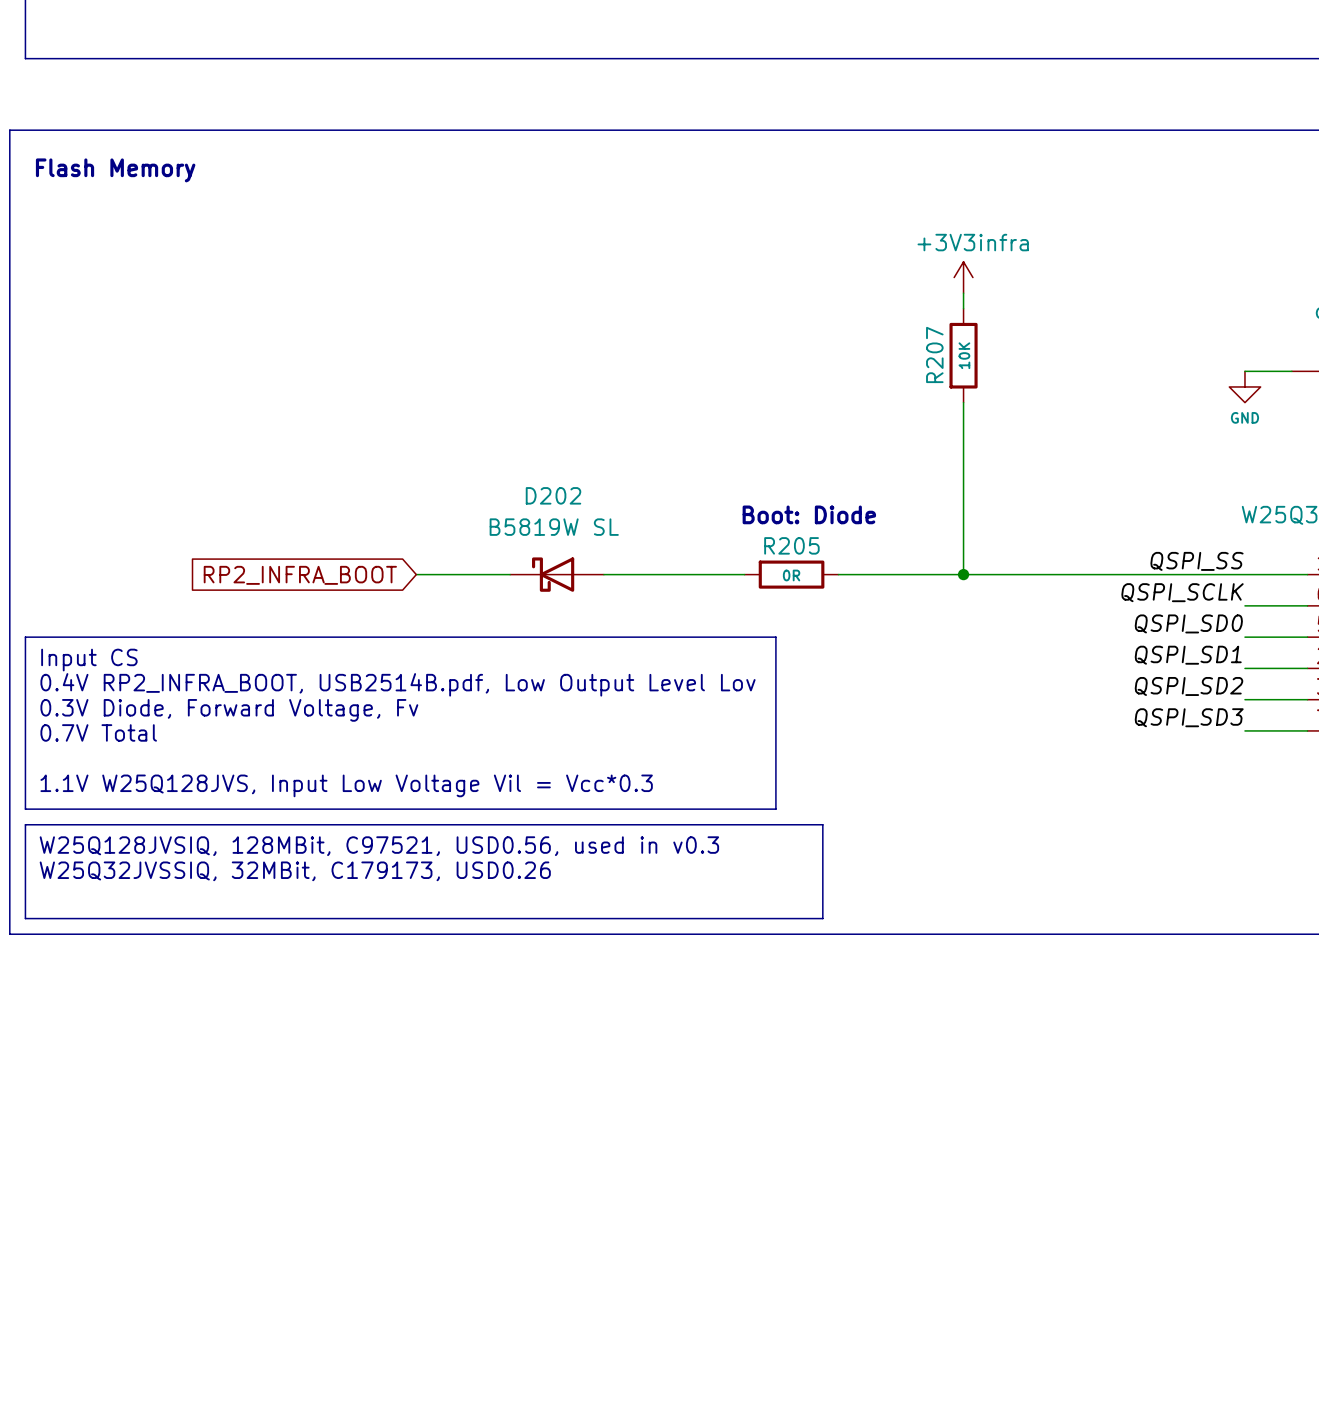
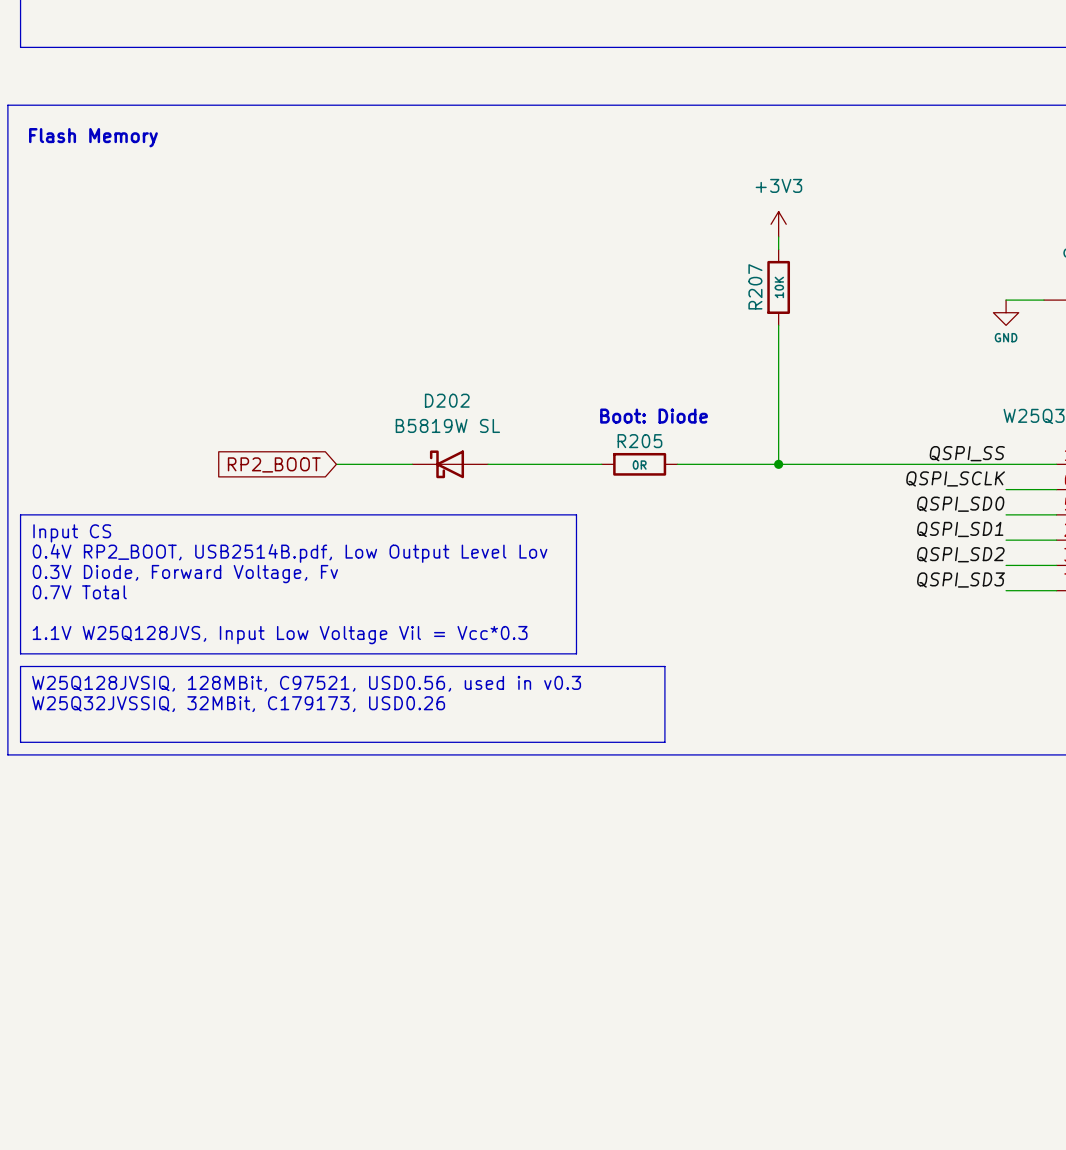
power symbol: +3V3infra (963, 277) -> +3V3 (778, 224)
global label: RP2_INFRA_BOOT (300, 575) -> RP2_BOOT (274, 464)
line: (713, 637) (775, 637) (775, 809) (713, 809) -> (576, 514) (576, 653)
text: 0.4V RP2_INFRA_BOOT, USB2514B.pdf, Low Output Level Lov (398, 684) -> 0.4V RP2_BOOT, USB2514B.pdf, Low Output Level Lov (290, 553)

